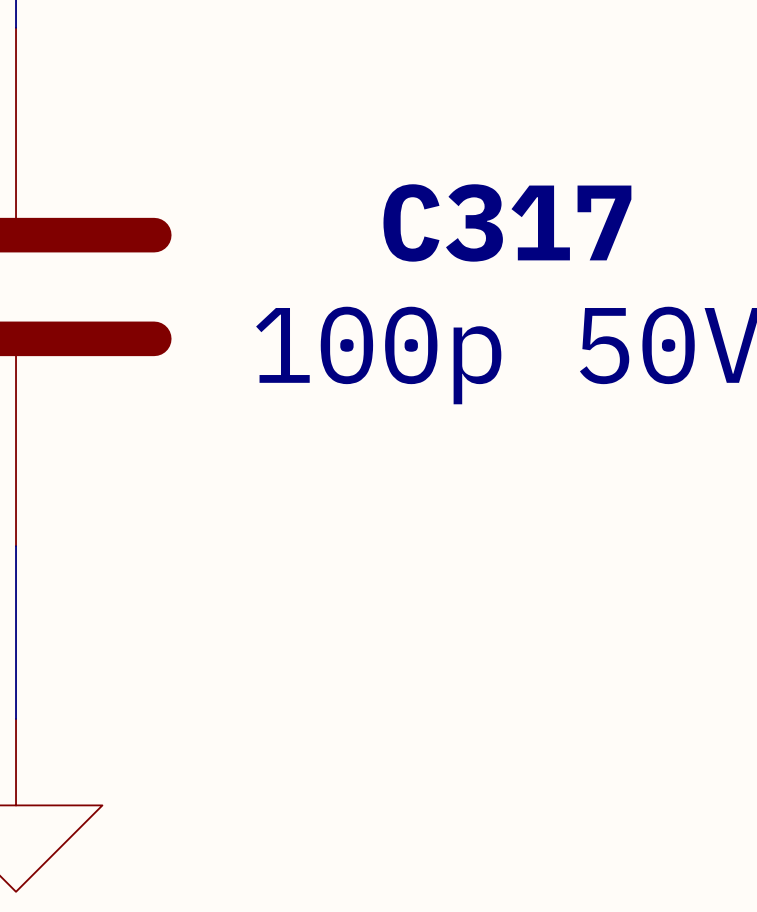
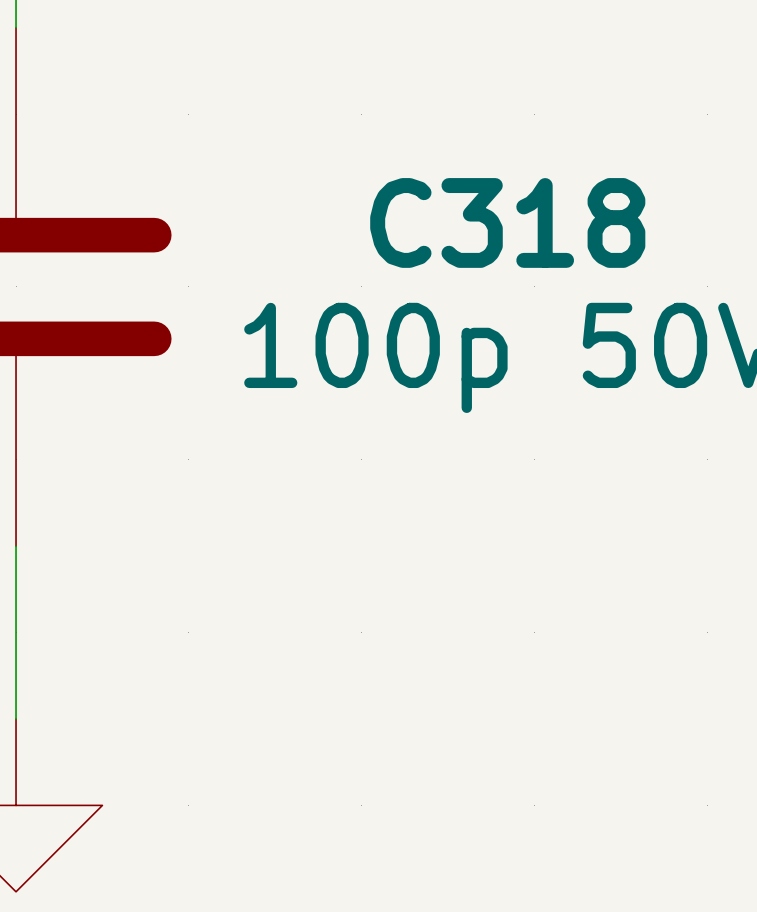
C317 name: C317 (507, 222) -> C318 (507, 222)

